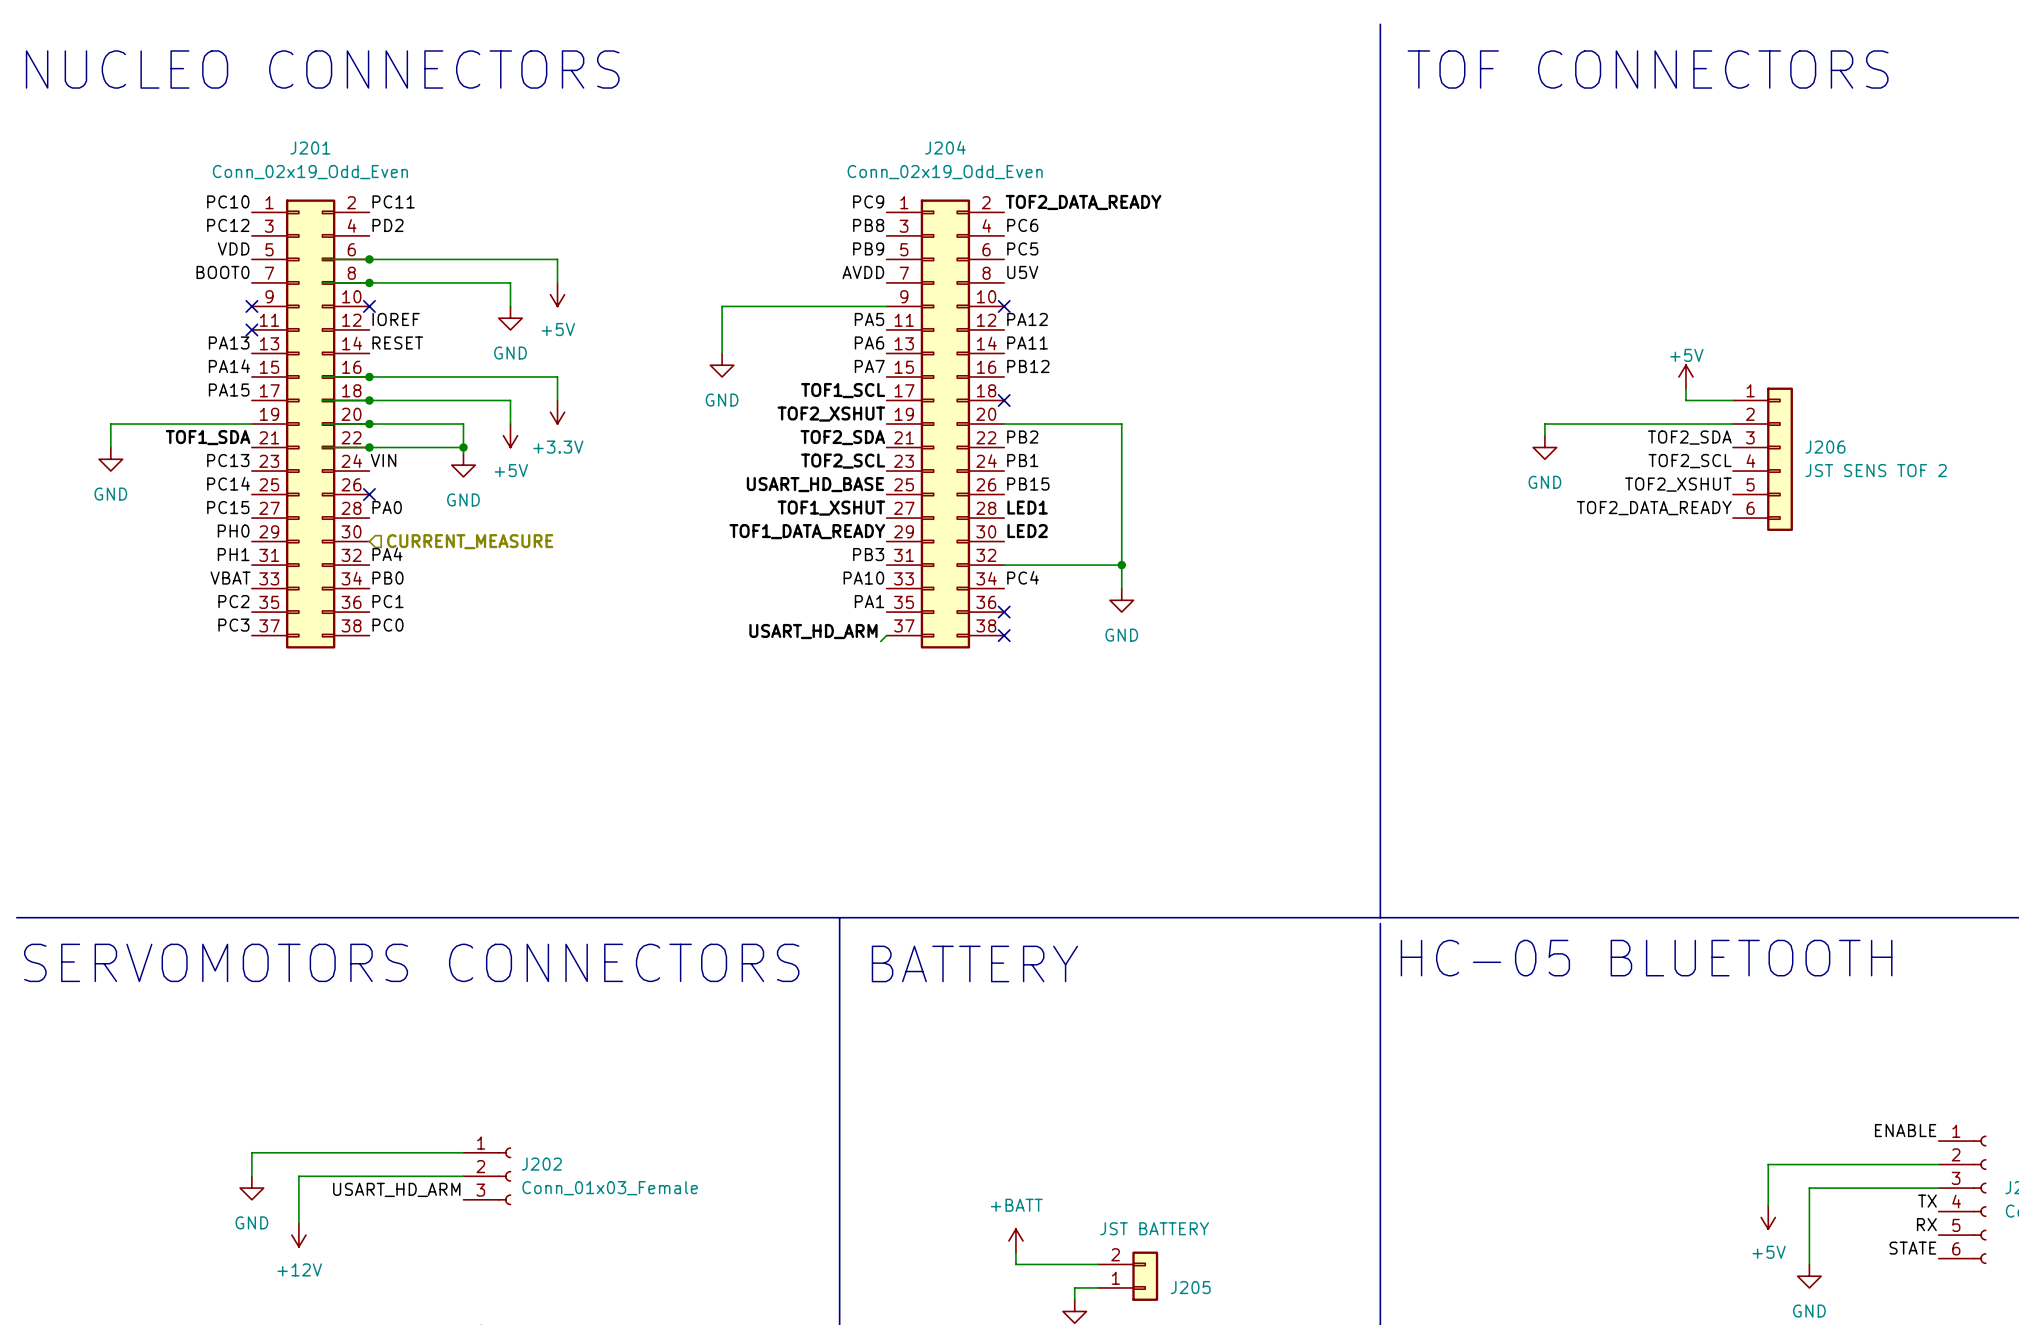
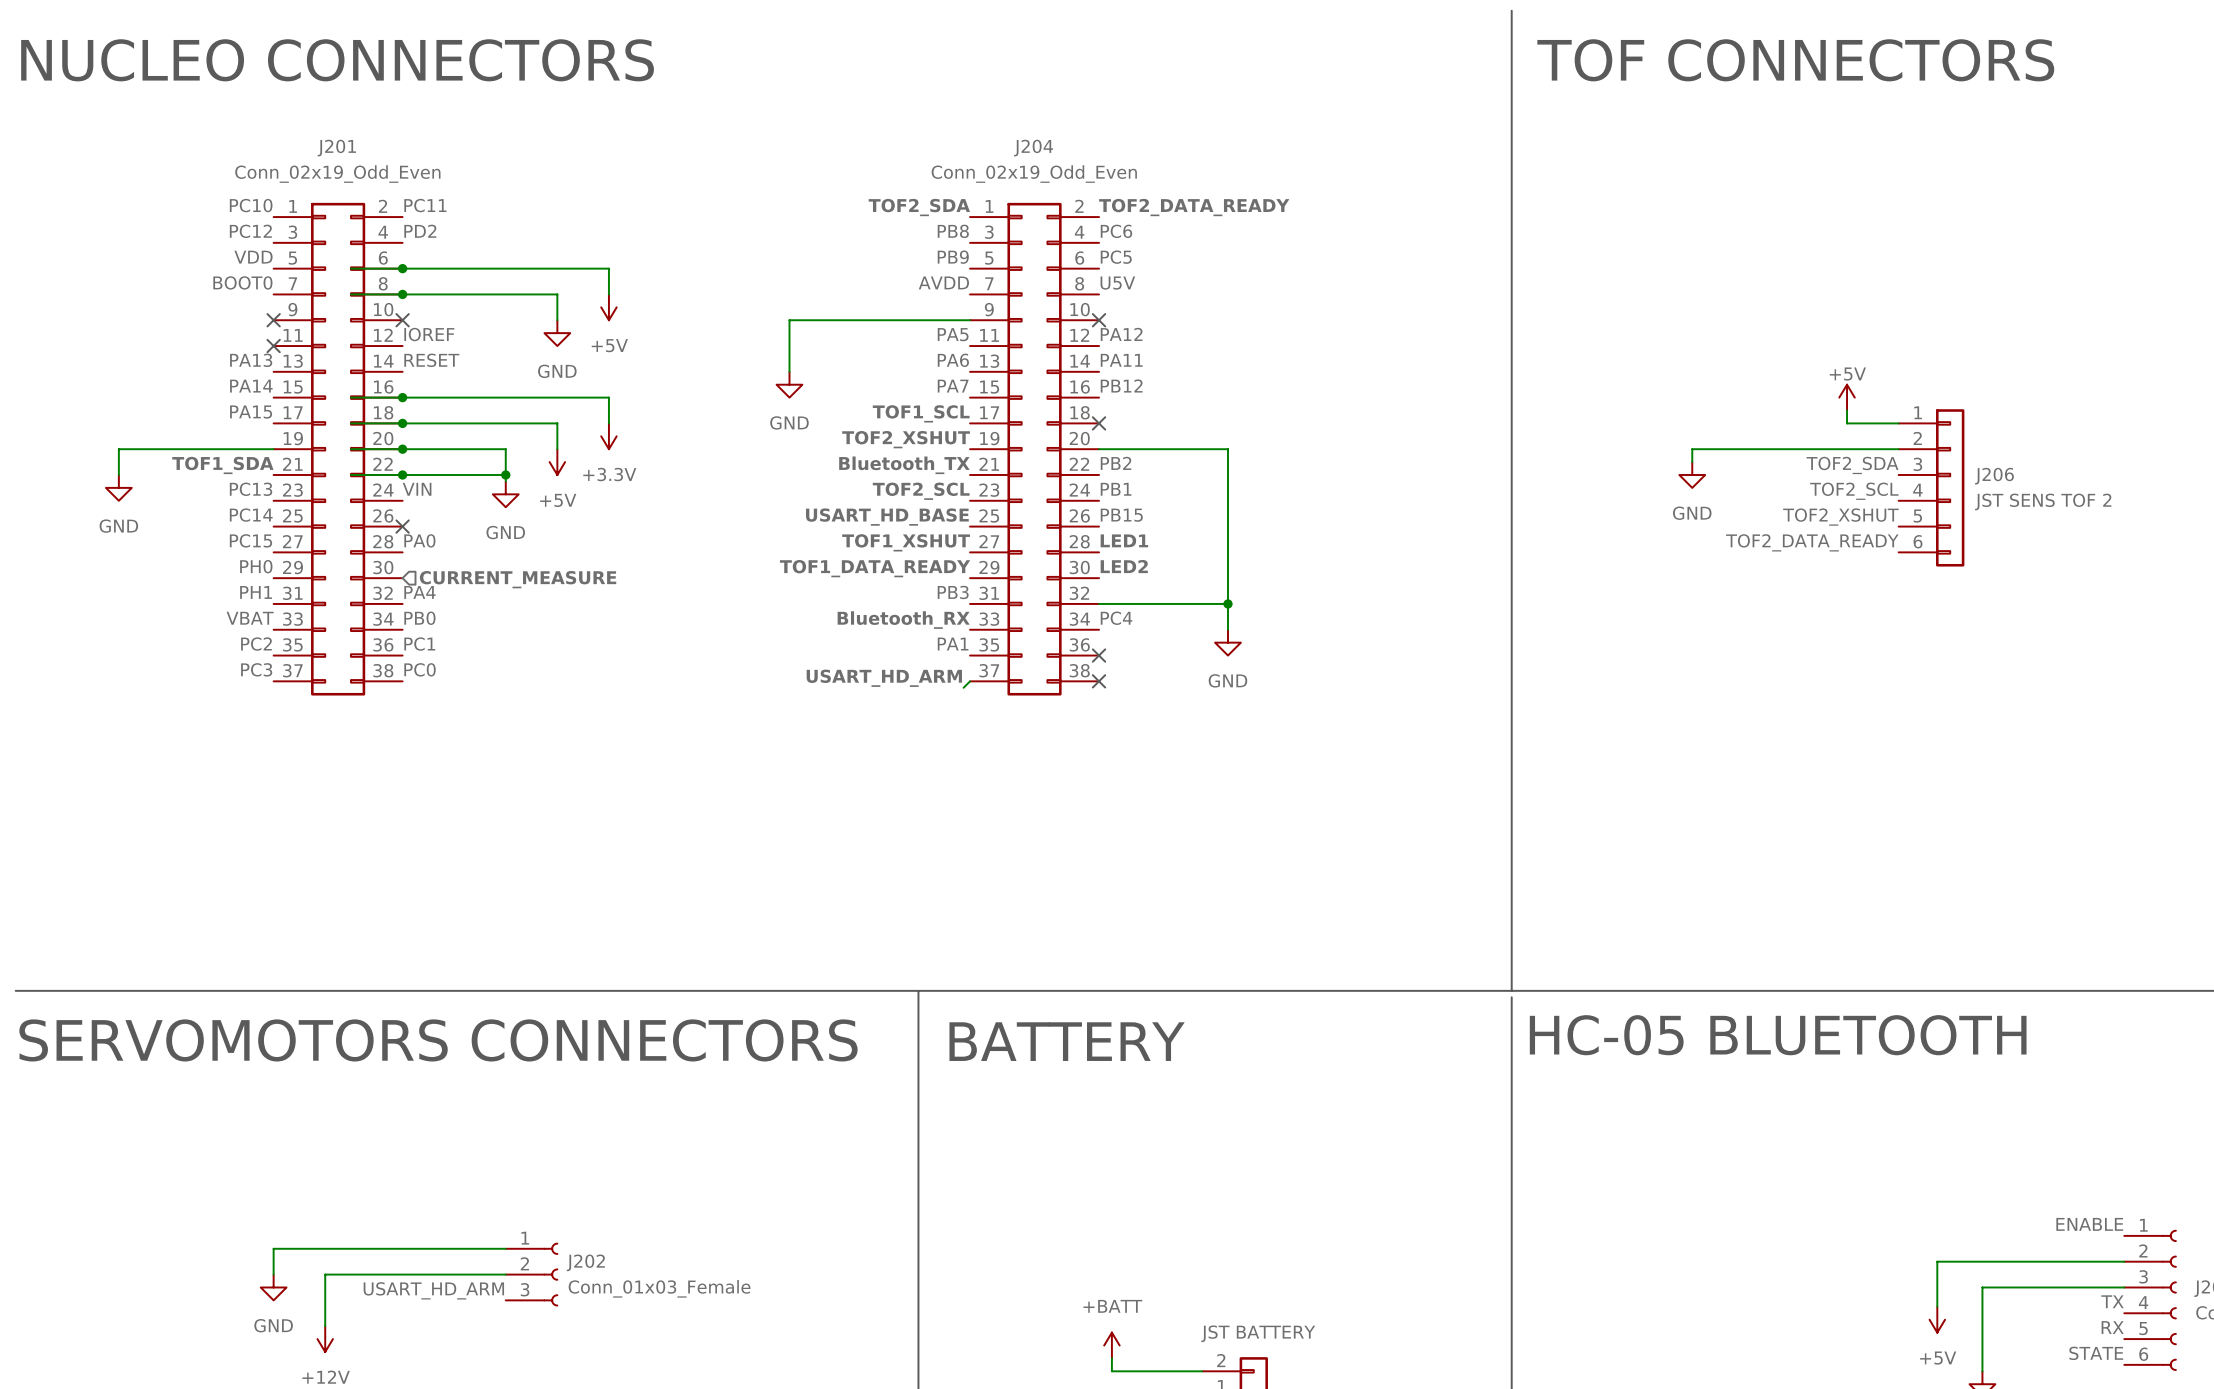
label: PC9 (868, 201) -> TOF2_SDA (919, 207)
label: TOF2_SDA (842, 437) -> Bluetooth_TX (904, 465)
label: PA10 (863, 578) -> Bluetooth_RX (903, 620)

